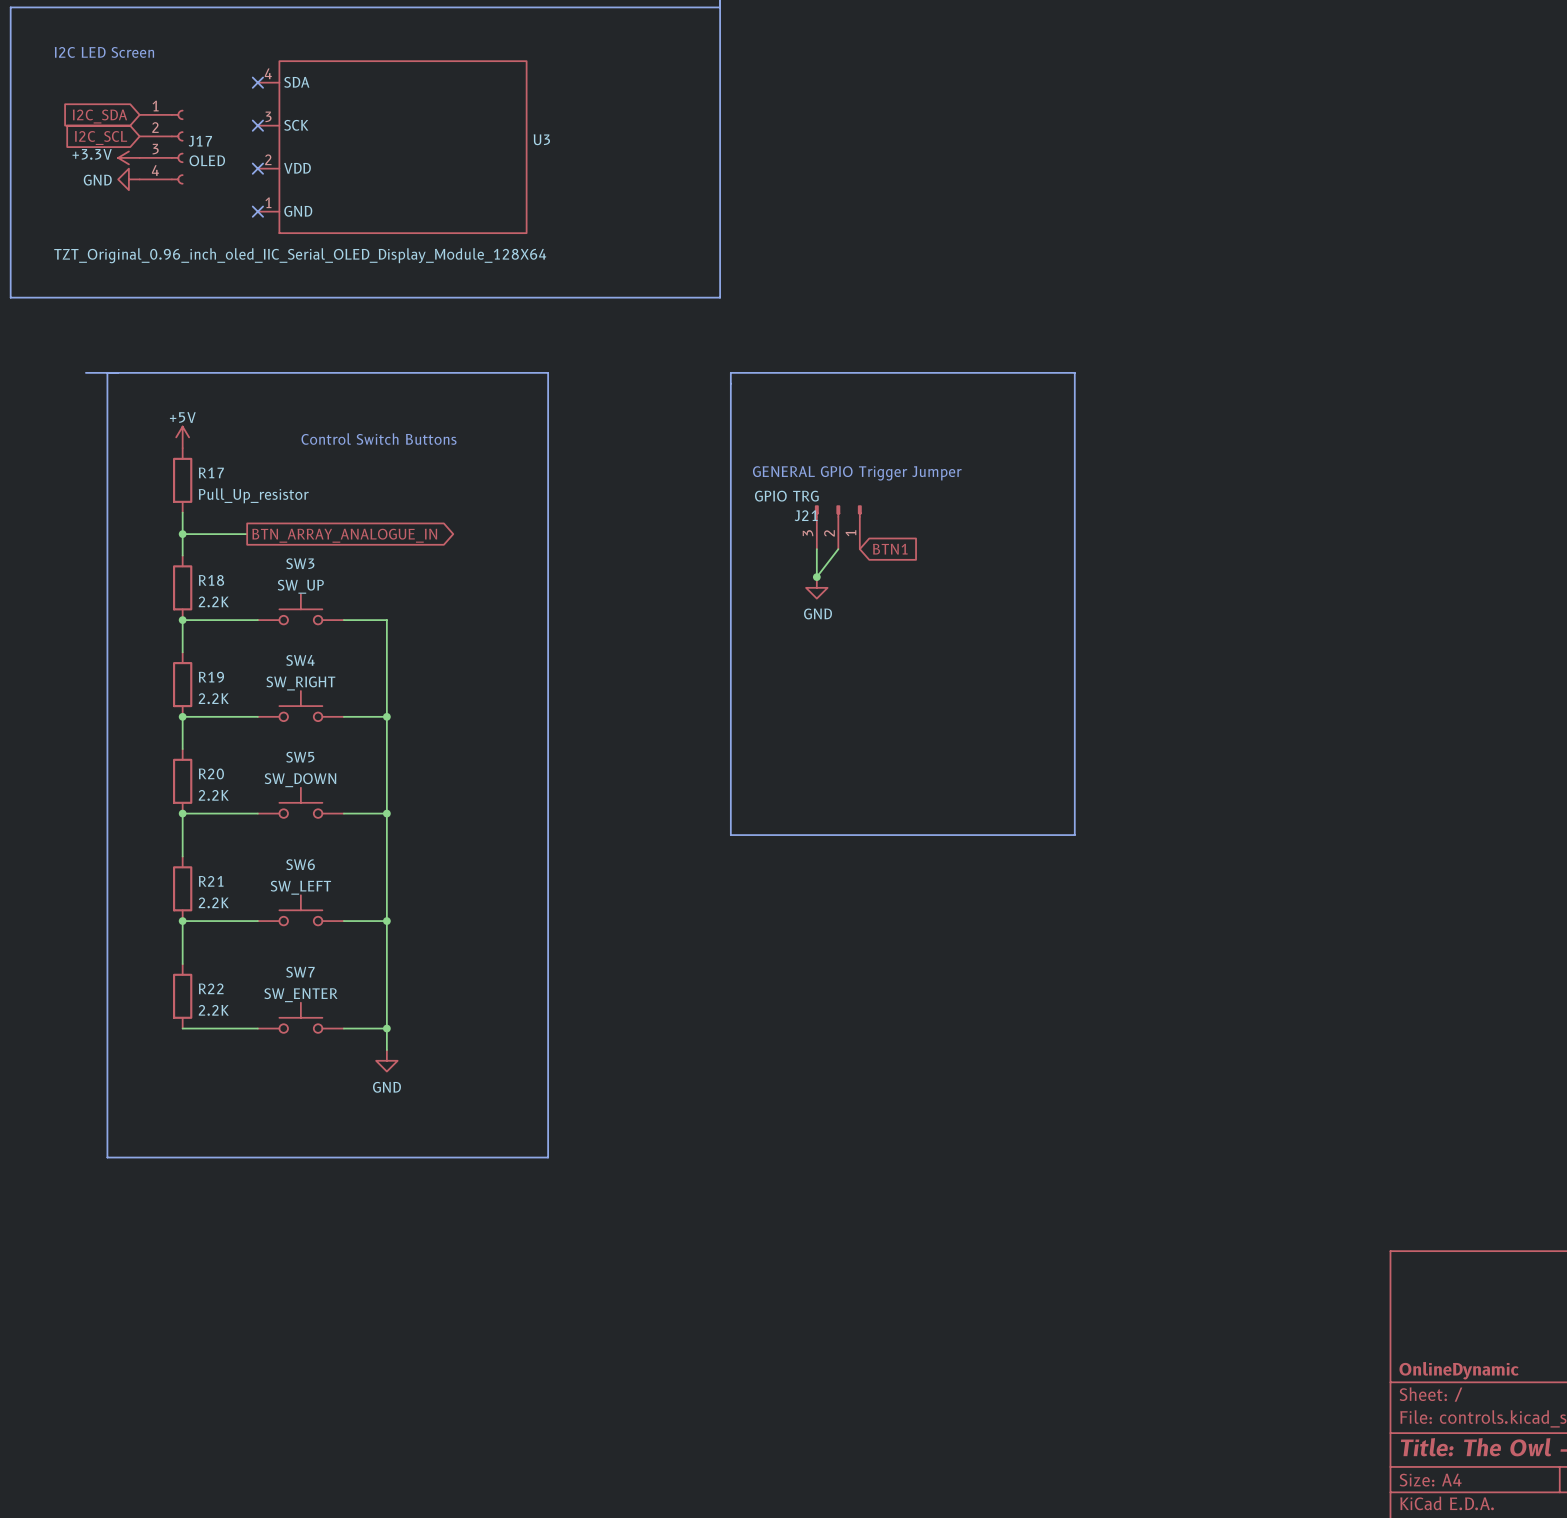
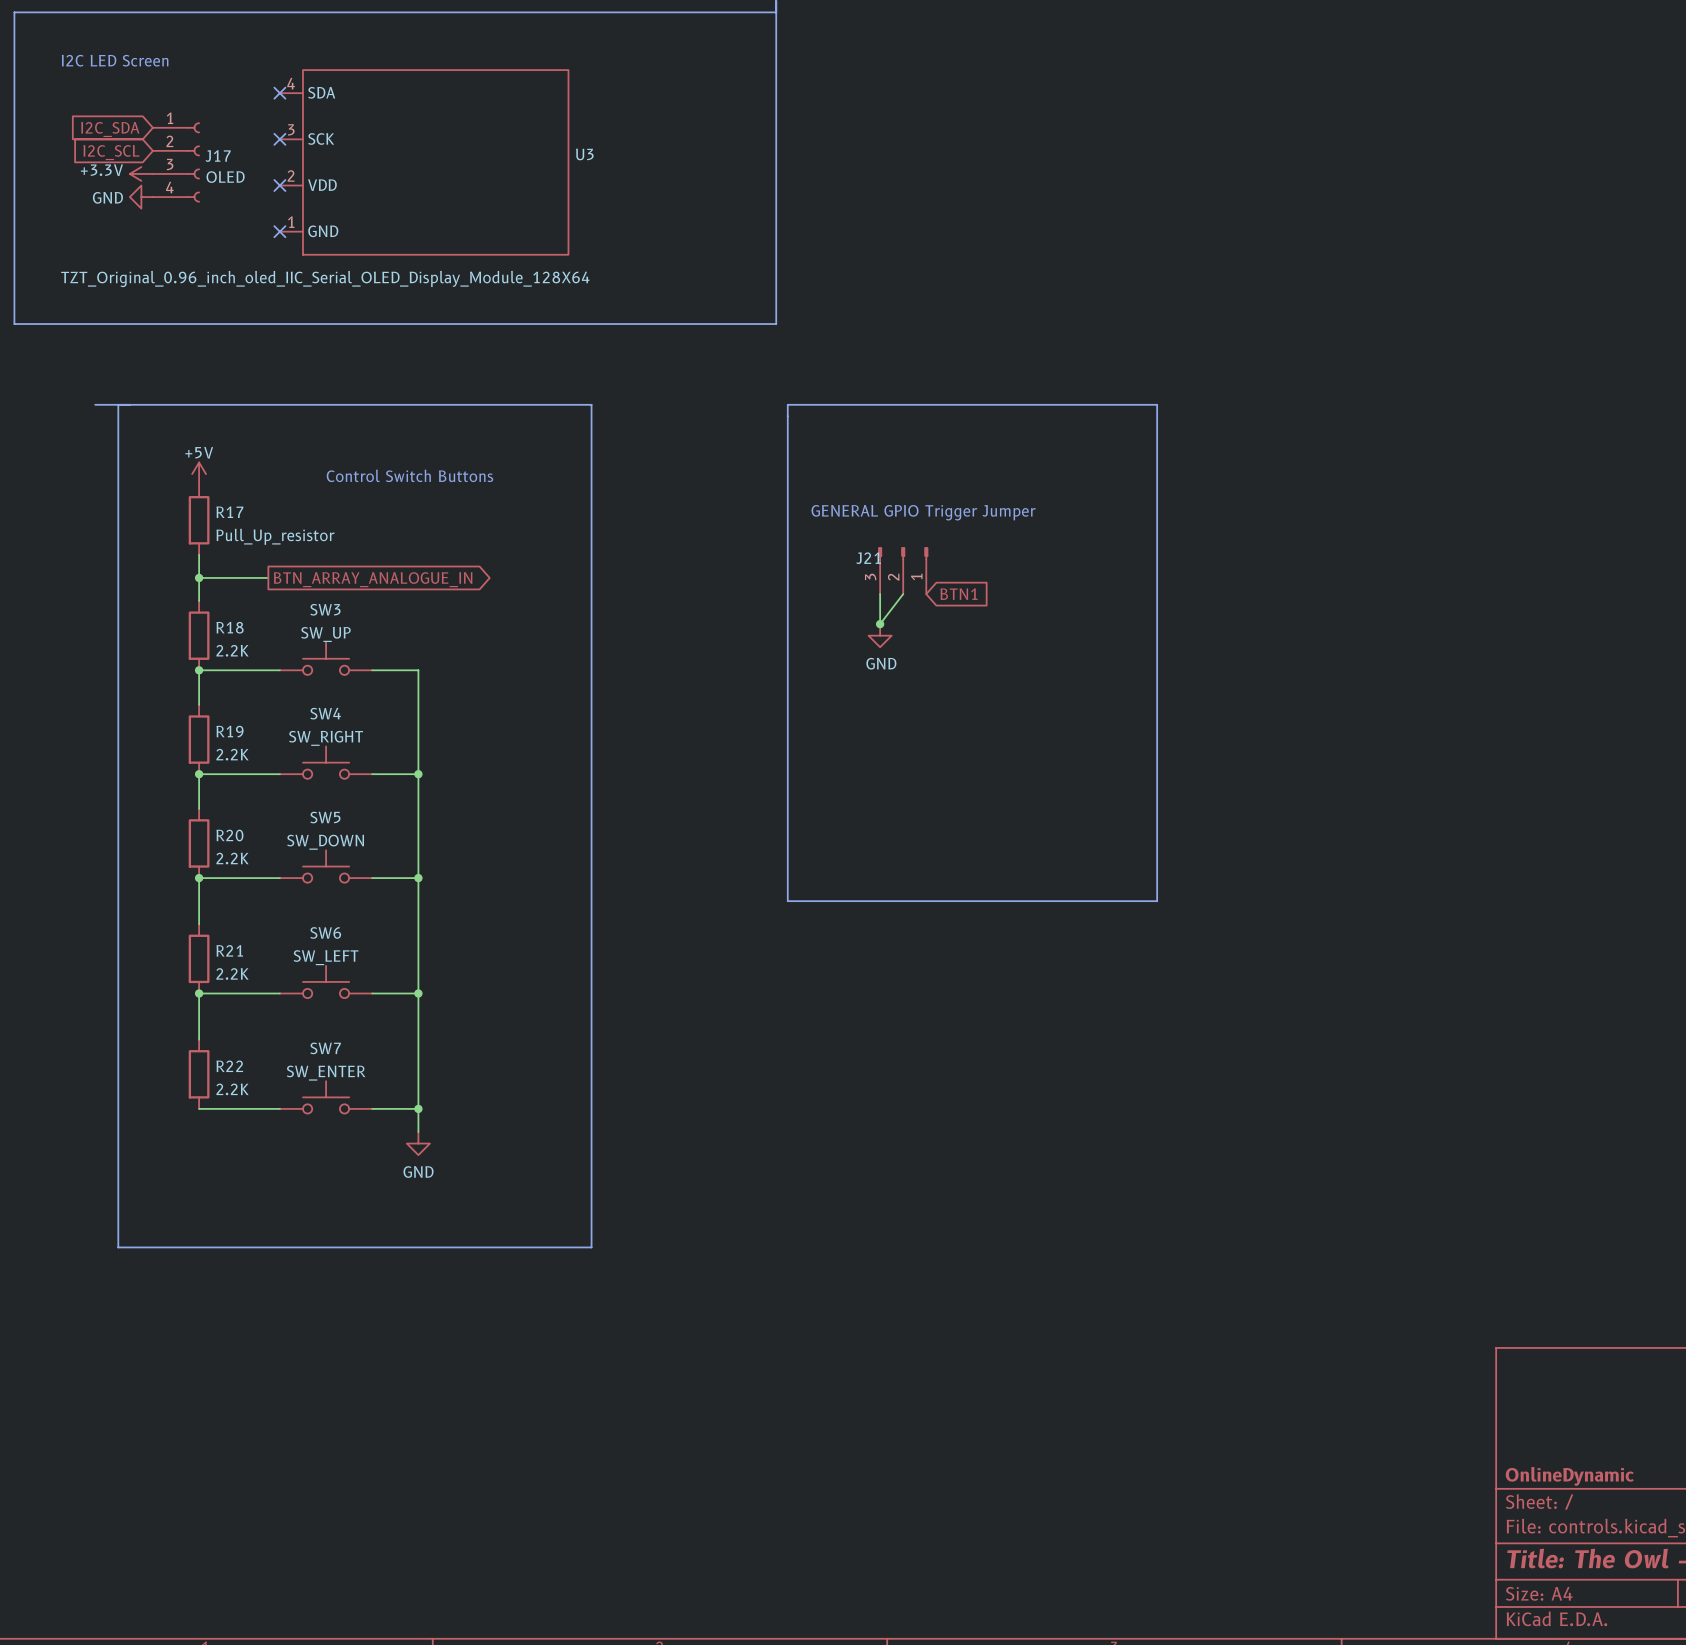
J21 value: GPIO TRG (786, 496) -> none

